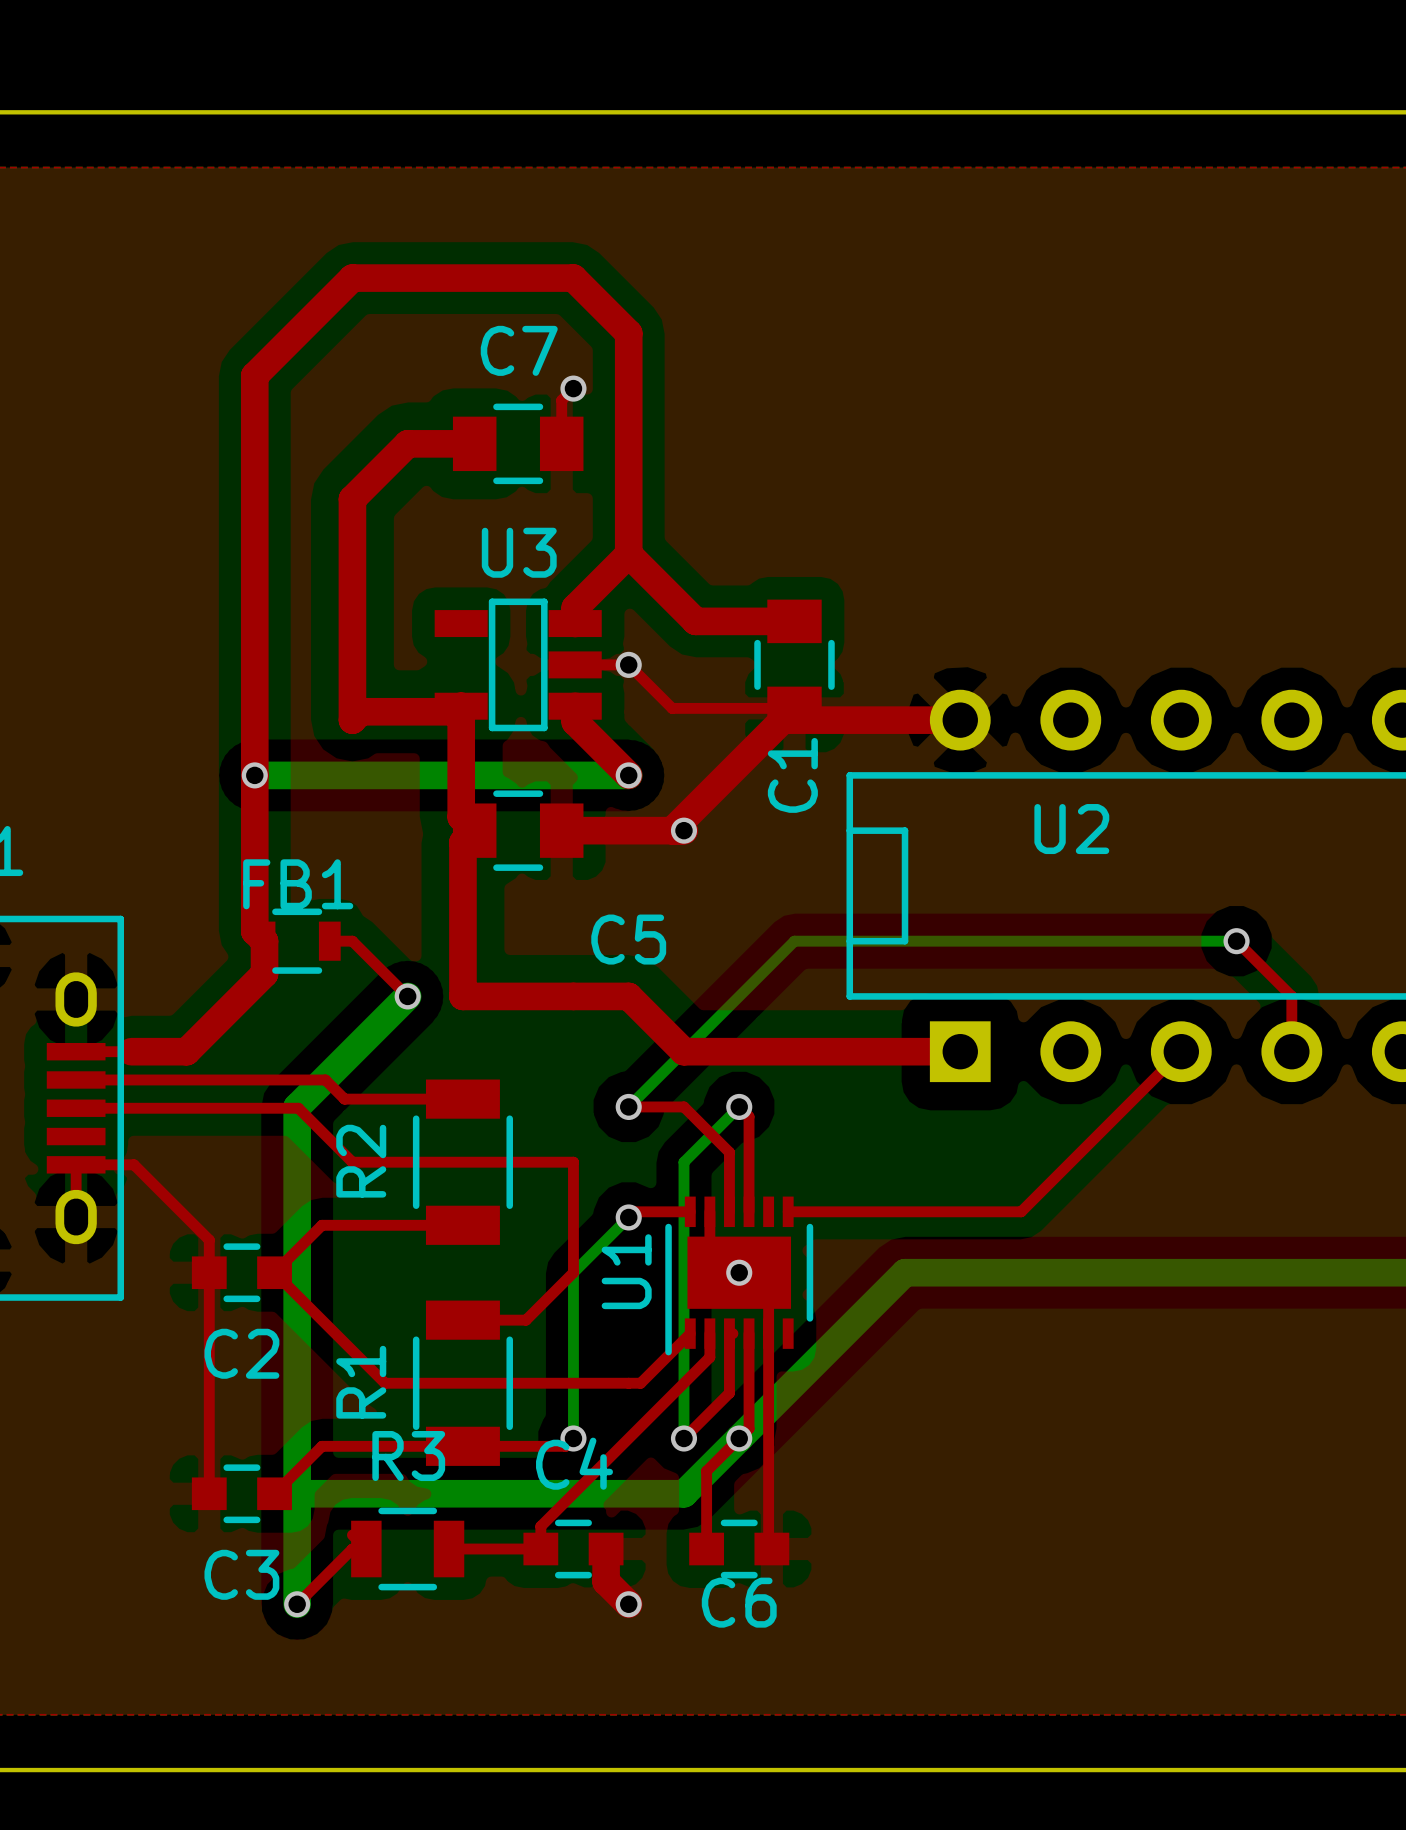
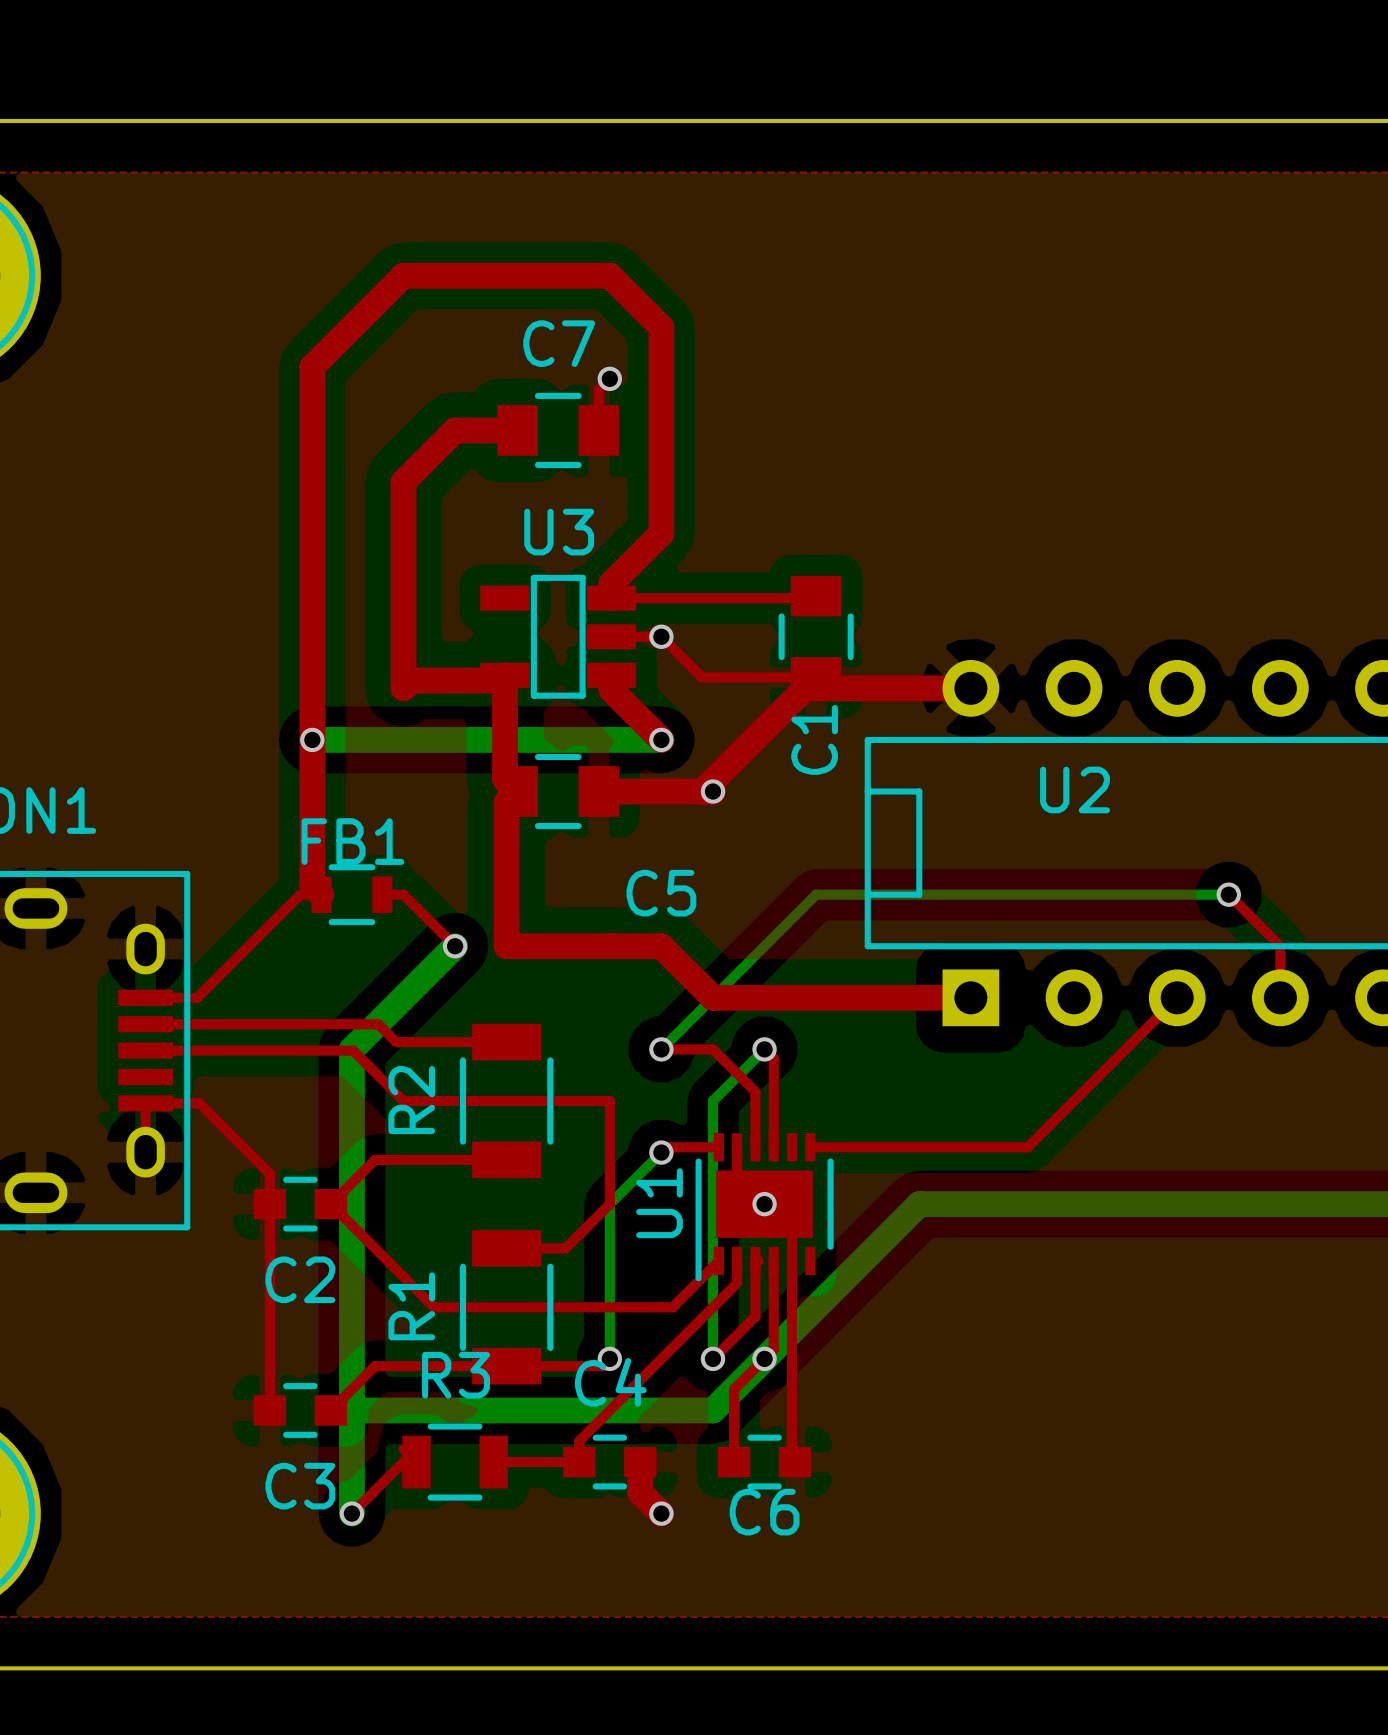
top track: (628, 554) (695, 621) (794, 621) -> none
top track: none -> (611, 598) (814, 598)
top track: (264, 941) (264, 973) (186, 1051) (131, 1051) -> (321, 894) (300, 894) (197, 997)

